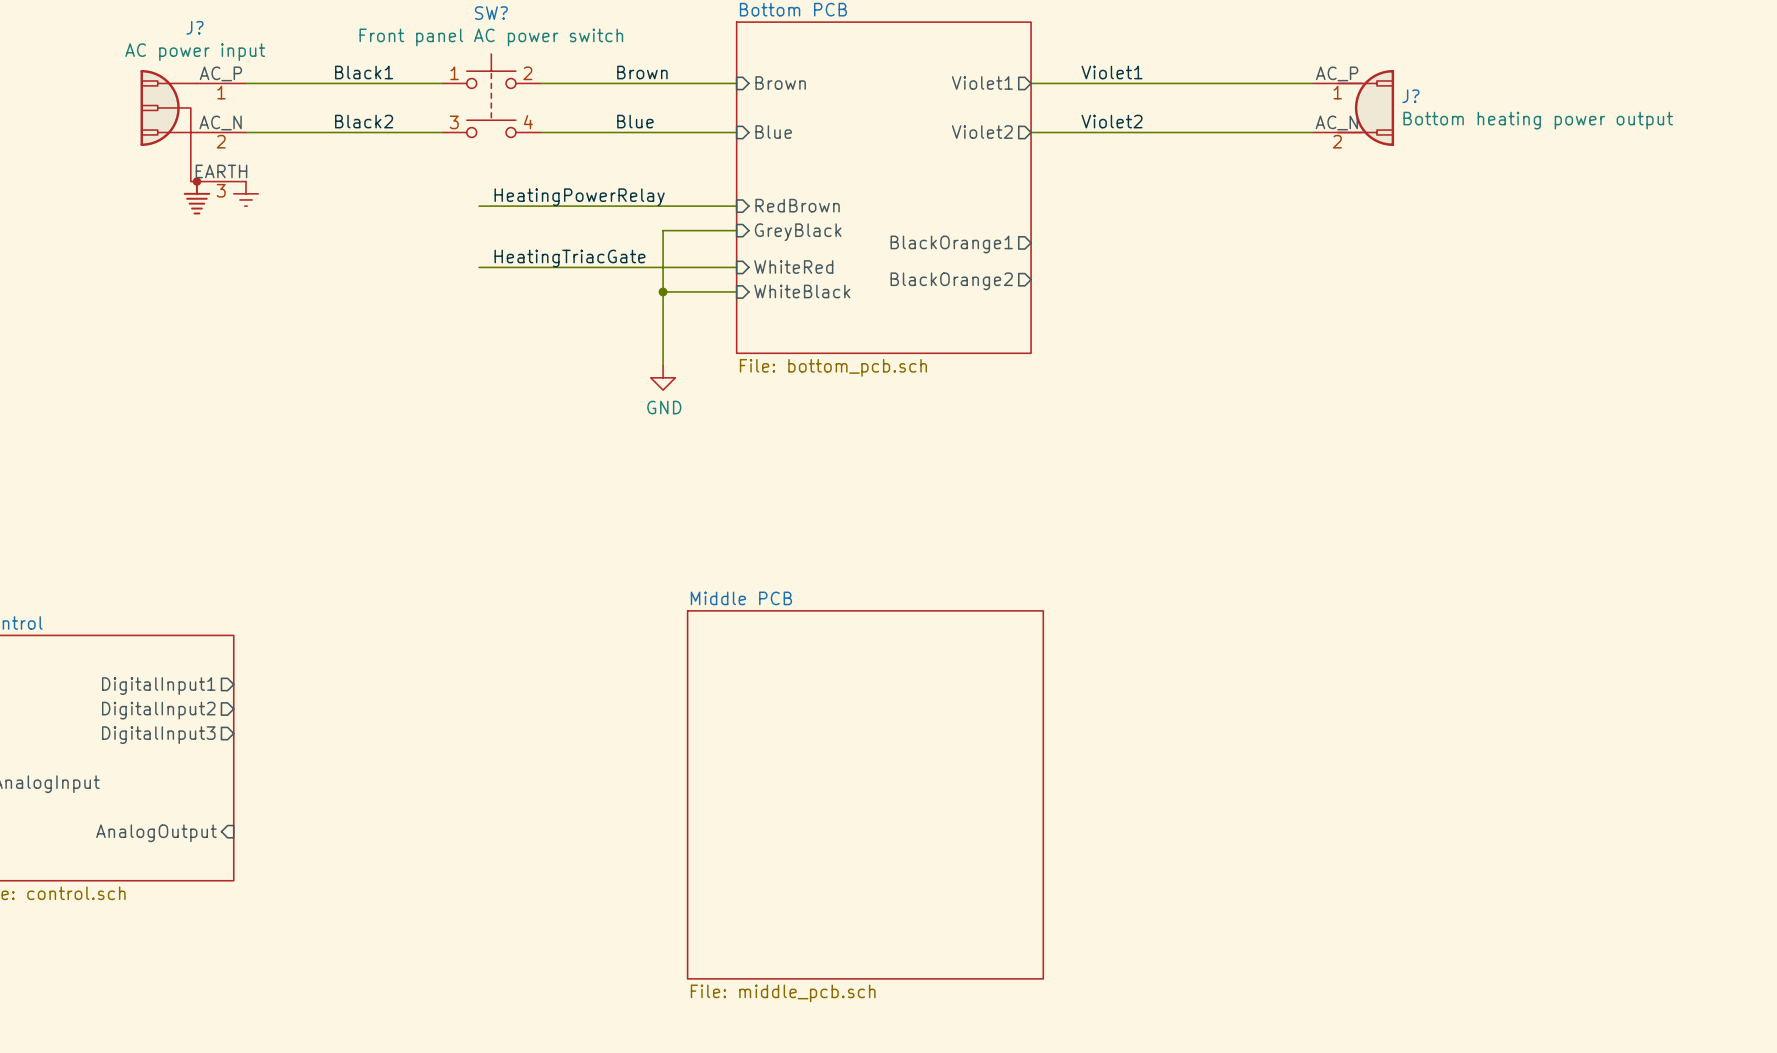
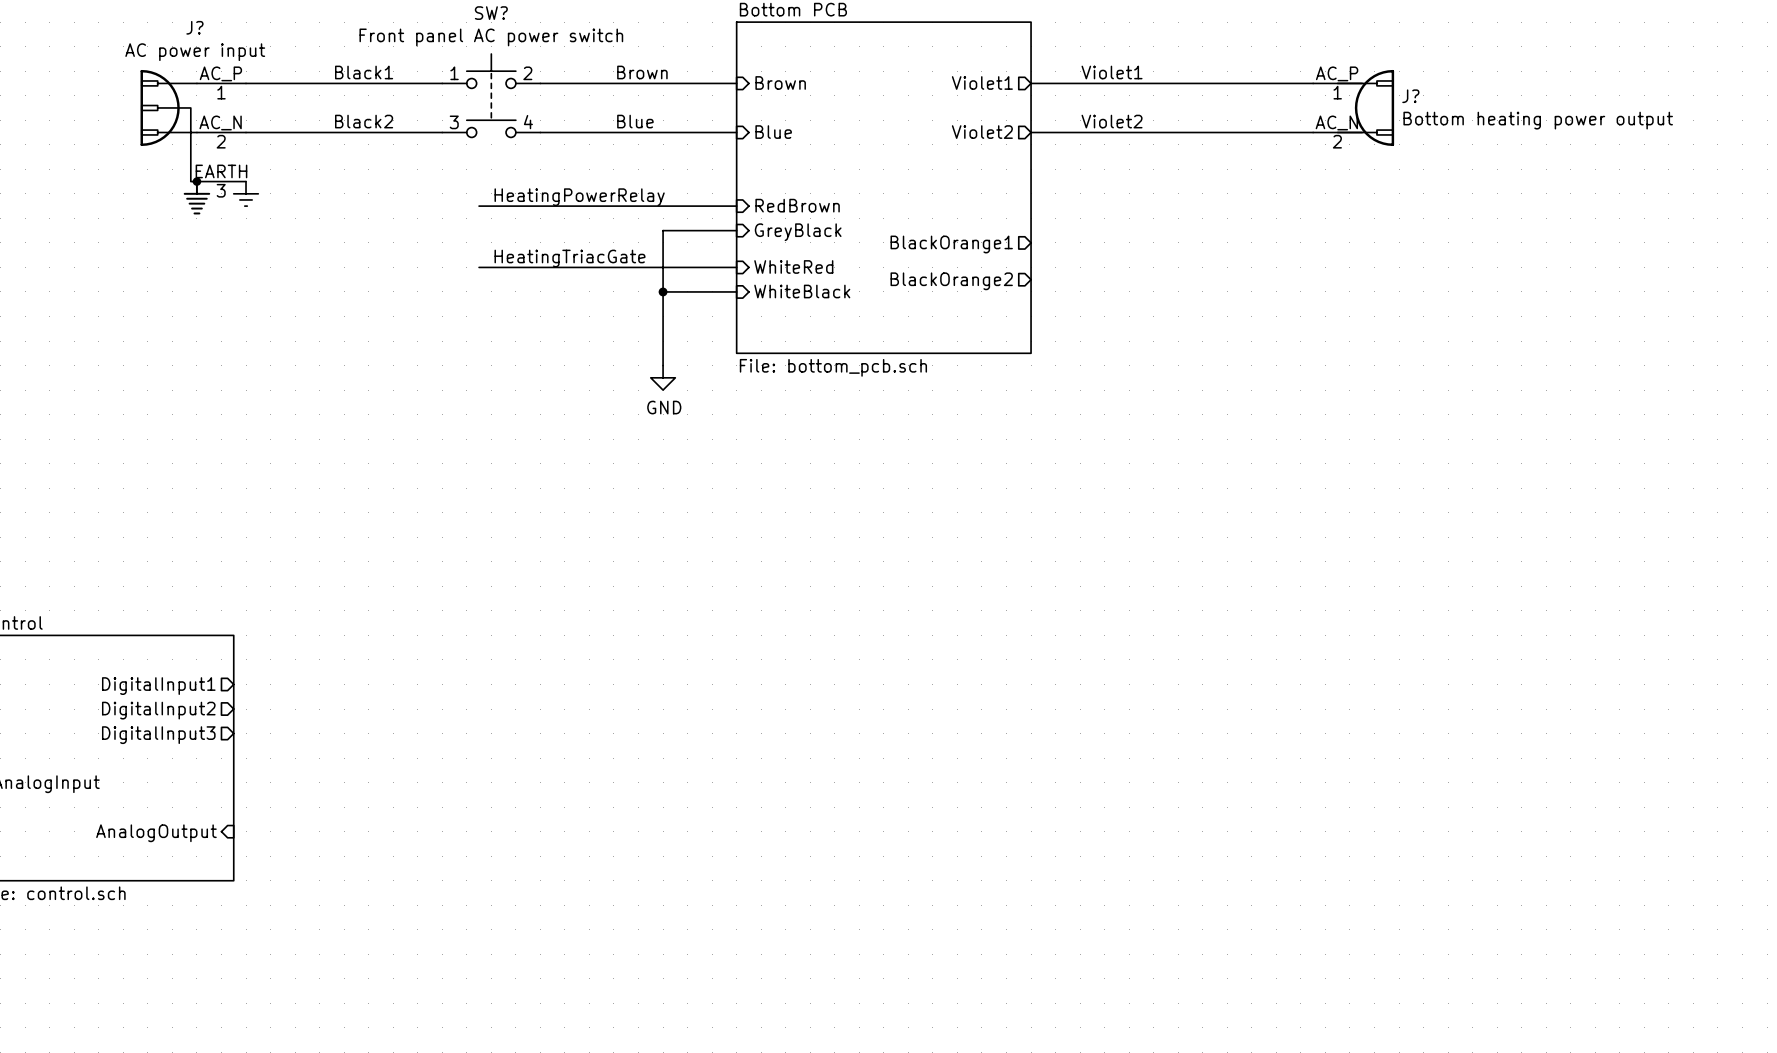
sheet Middle PCB: File: middle_pcb.sch (865, 794) -> none

